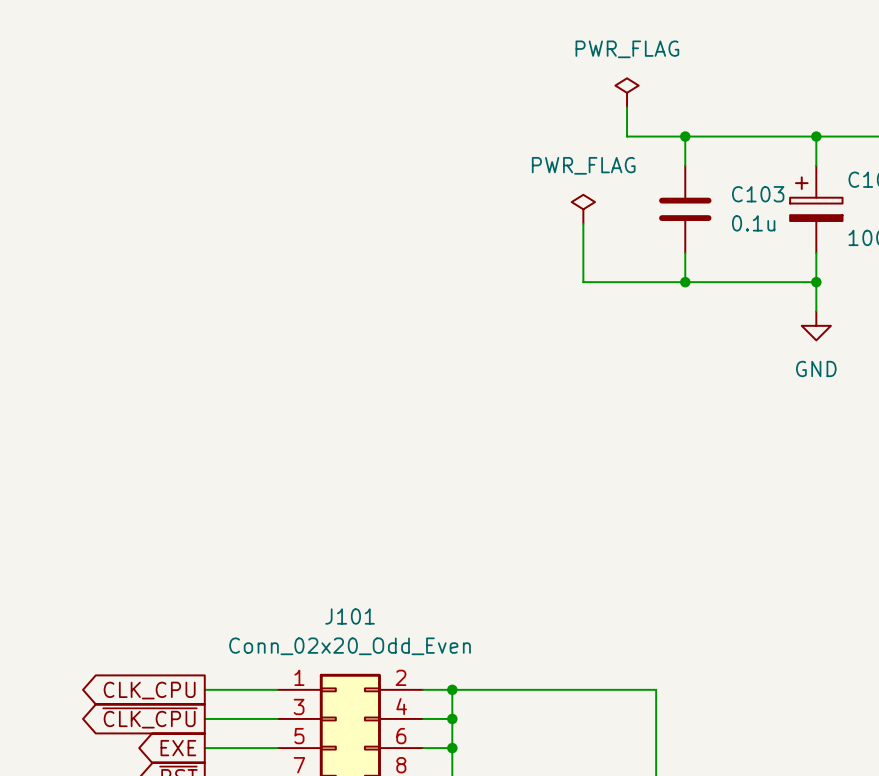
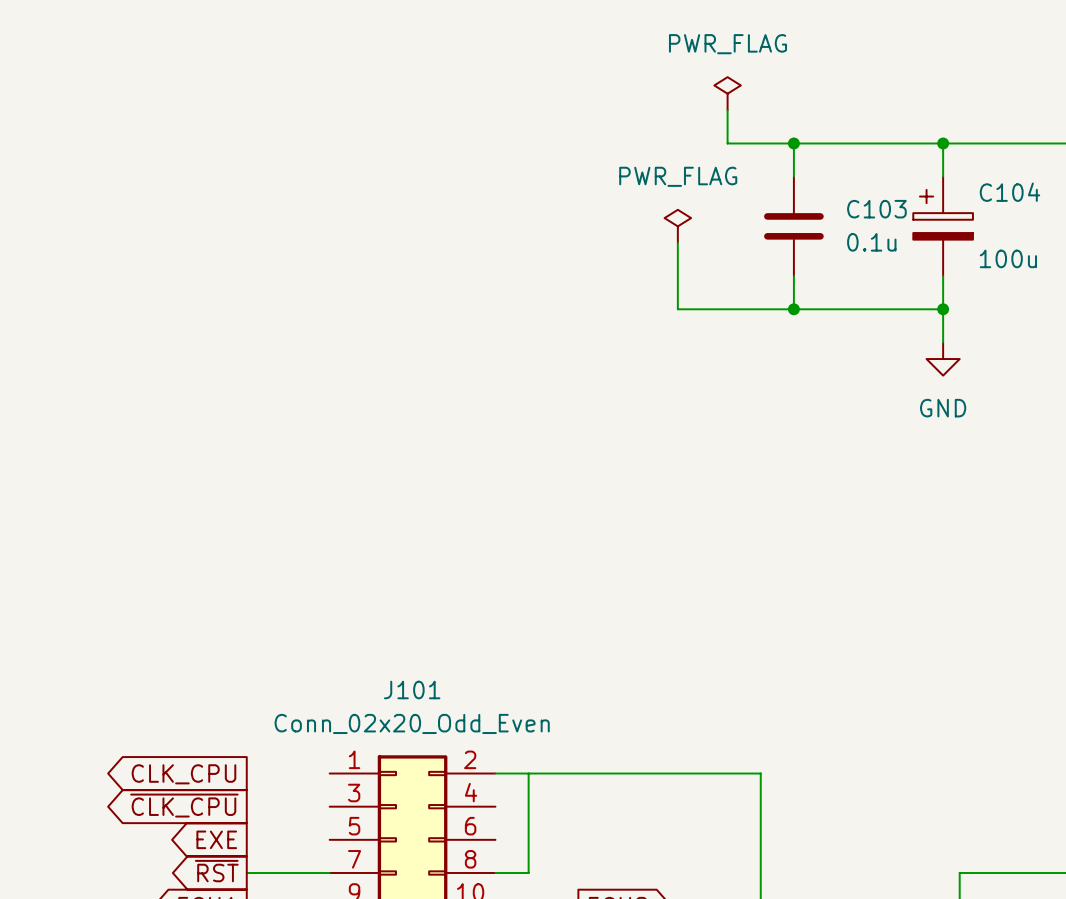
wire: (204, 689) (277, 689) -> none
junction: (452, 689) -> none
wire: (204, 718) (277, 718) -> none
wire: (423, 718) (452, 718) -> none
junction: (452, 718) -> none
wire: (204, 748) (277, 748) -> none
wire: (423, 748) (452, 748) -> none
junction: (452, 748) -> none

